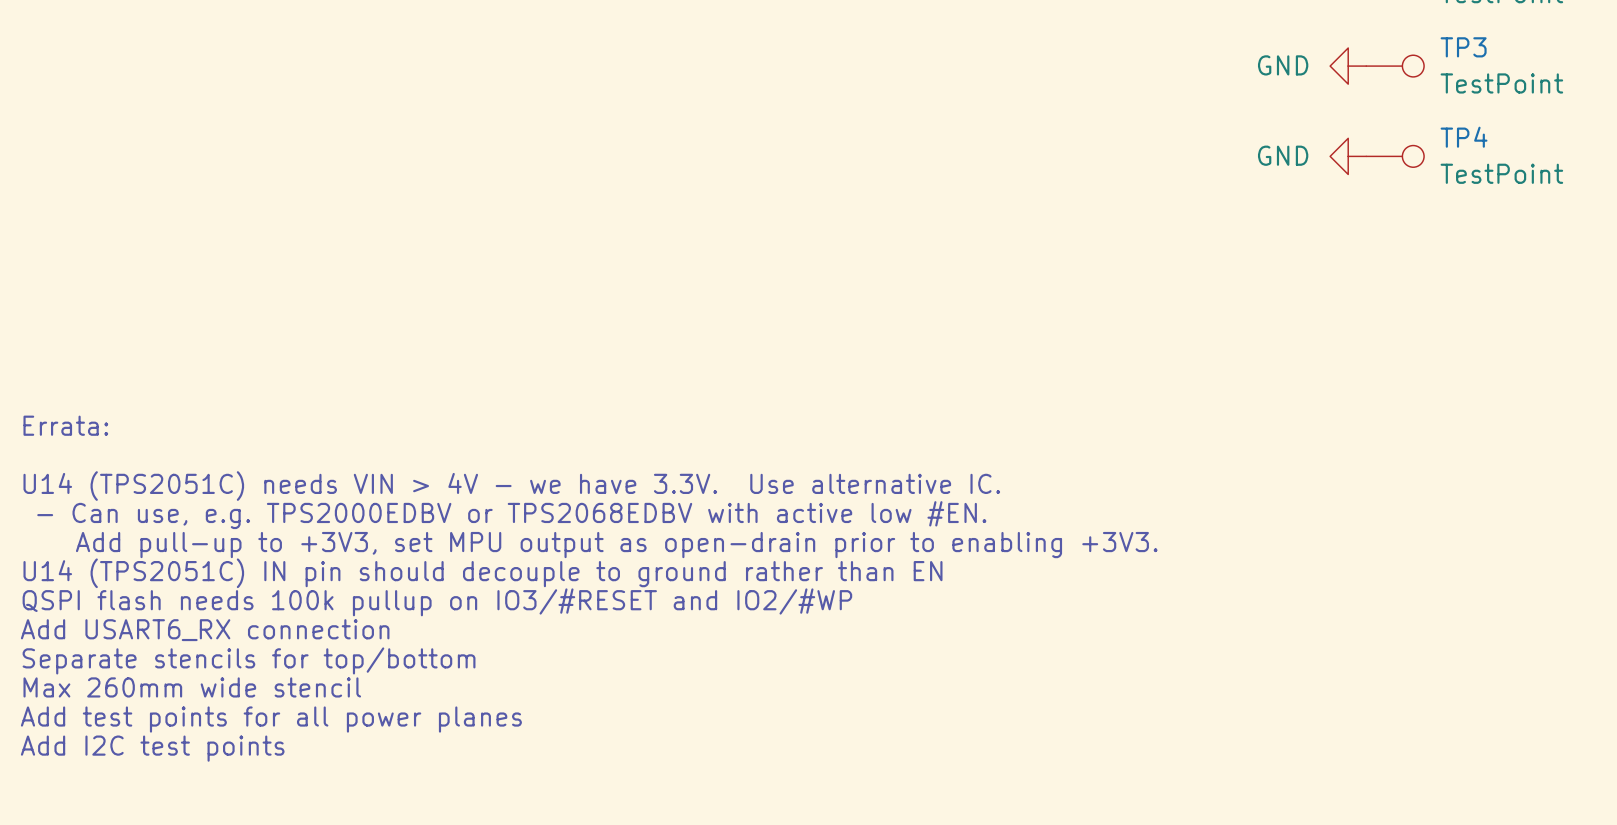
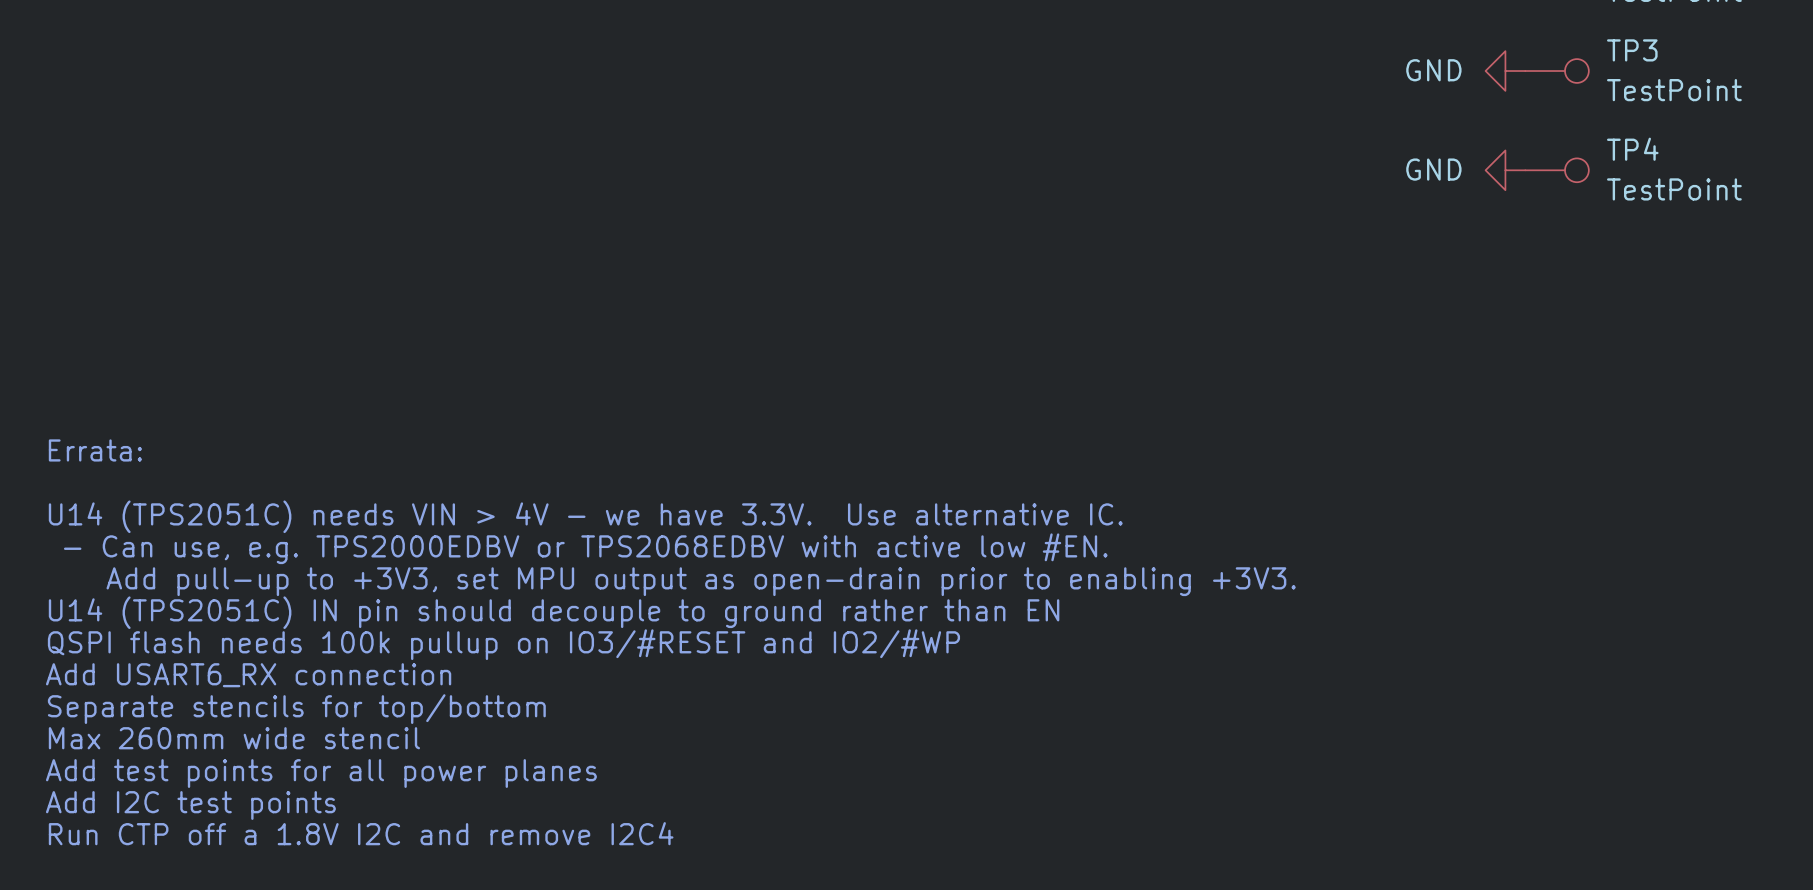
text position: Errata: (65, 425) -> Errata: (95, 450)
text position: U14 (TPS2051C) needs VIN > 4V - we have 3.3V. Use alternative IC. (511, 486) -> U14 (TPS2051C) needs VIN > 4V - we have 3.3V. Use alternative IC. (585, 516)
text position: - Can use, e.g. TPS2000EDBV or TPS2068EDBV with active low #EN. (511, 515) -> - Can use, e.g. TPS2000EDBV or TPS2068EDBV with active low #EN. (585, 548)
text position: Add pull-up to +3V3, set MPU output as open-drain prior to enabling +3V3. (616, 545) -> Add pull-up to +3V3, set MPU output as open-drain prior to enabling +3V3. (701, 581)
text position: U14 (TPS2051C) IN pin should decouple to ground rather than EN (482, 573) -> U14 (TPS2051C) IN pin should decouple to ground rather than EN (554, 612)
text position: QSPI flash needs 100k pullup on IO3/#RESET and IO2/#WP (437, 602) -> QSPI flash needs 100k pullup on IO3/#RESET and IO2/#WP (503, 644)
text position: Add USART6_RX connection (205, 630) -> Add USART6_RX connection (248, 675)
text position: Separate stencils for top/bottom (249, 660) -> Separate stencils for top/bottom (296, 709)
text position: Max 260mm wide stencil (192, 687) -> Max 260mm wide stencil (234, 738)
text position: Add test points for all power planes (271, 719) -> Add test points for all power planes (321, 773)
text position: Add I2C test points (152, 748) -> Add I2C test points (190, 805)
text: none -> Run CTP off a 1.8V I2C and remove I2C4 (361, 833)

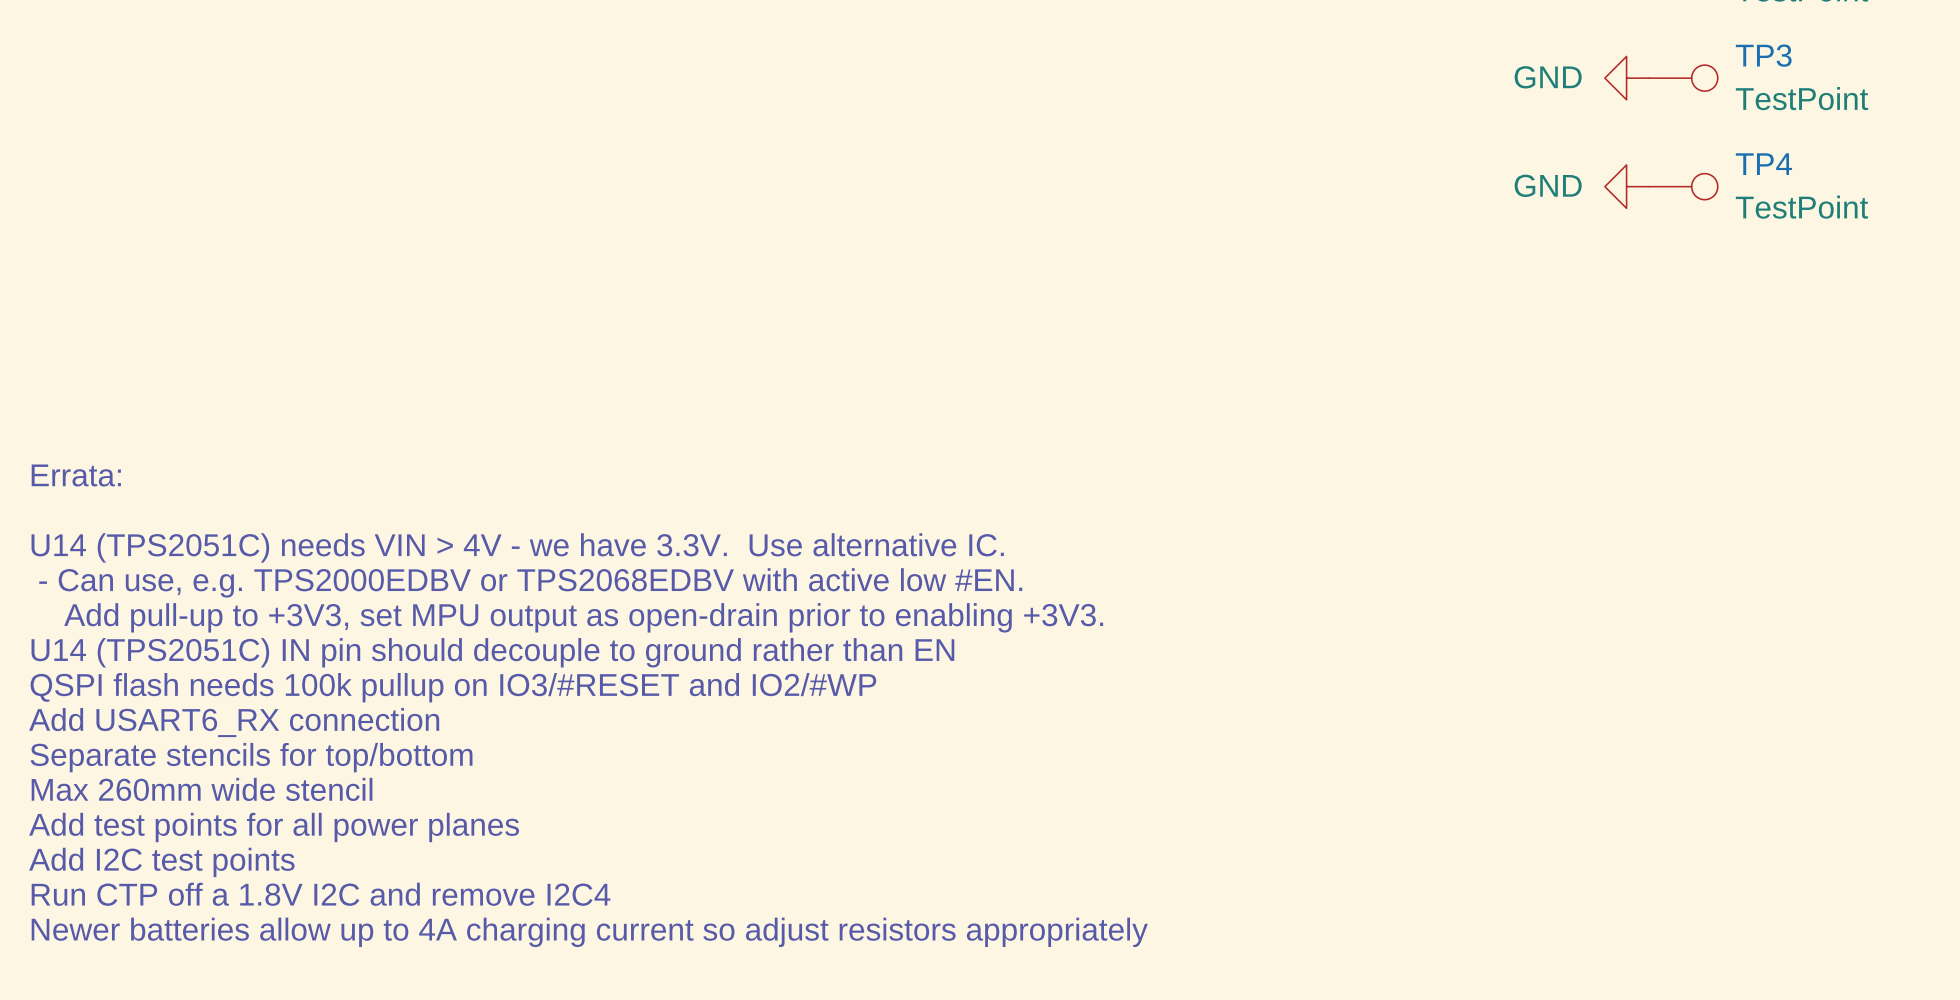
text position: Errata: (95, 450) -> Errata: (76, 475)
text position: U14 (TPS2051C) needs VIN > 4V - we have 3.3V. Use alternative IC. (585, 516) -> U14 (TPS2051C) needs VIN > 4V - we have 3.3V. Use alternative IC. (517, 547)
text position: - Can use, e.g. TPS2000EDBV or TPS2068EDBV with active low #EN. (585, 548) -> - Can use, e.g. TPS2000EDBV or TPS2068EDBV with active low #EN. (530, 582)
text position: Add pull-up to +3V3, set MPU output as open-drain prior to enabling +3V3. (701, 581) -> Add pull-up to +3V3, set MPU output as open-drain prior to enabling +3V3. (583, 617)
text position: U14 (TPS2051C) IN pin should decouple to ground rather than EN (554, 612) -> U14 (TPS2051C) IN pin should decouple to ground rather than EN (492, 652)
text position: QSPI flash needs 100k pullup on IO3/#RESET and IO2/#WP (503, 644) -> QSPI flash needs 100k pullup on IO3/#RESET and IO2/#WP (453, 687)
text position: Add USART6_RX connection (248, 675) -> Add USART6_RX connection (234, 722)
text position: Separate stencils for top/bottom (296, 709) -> Separate stencils for top/bottom (251, 757)
text position: Max 260mm wide stencil (234, 738) -> Max 260mm wide stencil (202, 789)
text position: Add test points for all power planes (321, 773) -> Add test points for all power planes (274, 827)
text position: Add I2C test points (190, 805) -> Add I2C test points (161, 862)
text position: Run CTP off a 1.8V I2C and remove I2C4 (361, 833) -> Run CTP off a 1.8V I2C and remove I2C4 (321, 894)
text: none -> Newer batteries allow up to 4A charging current so adjust resistors appropriately (589, 932)

